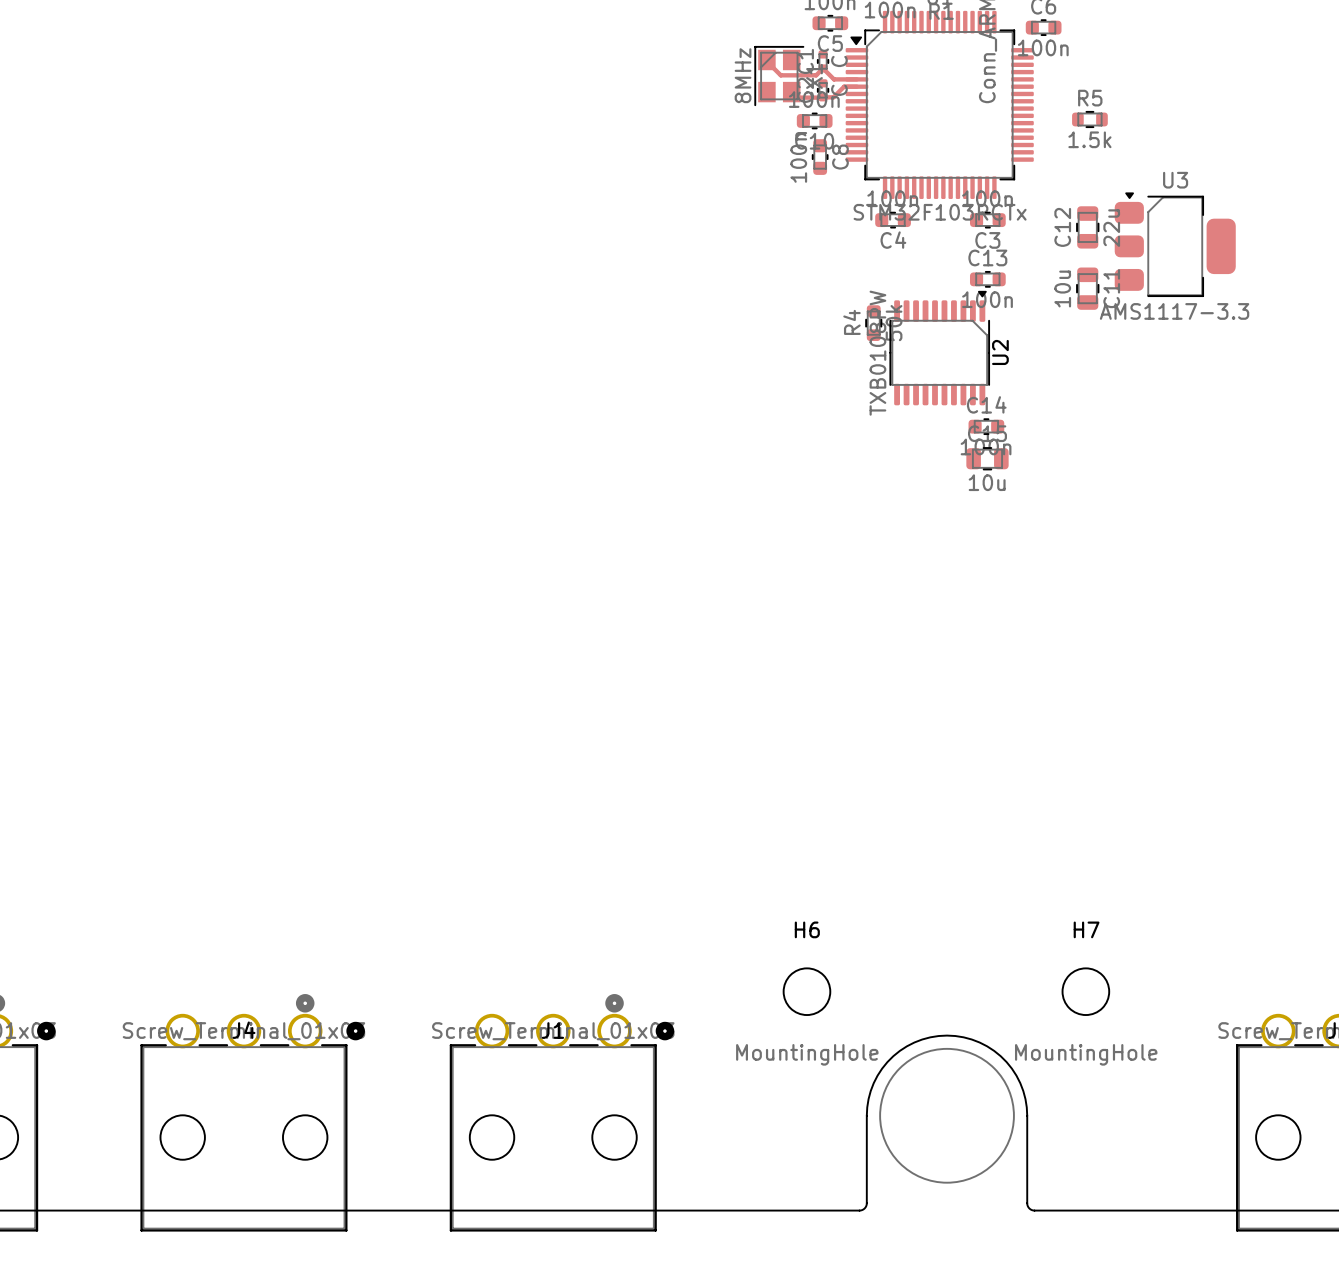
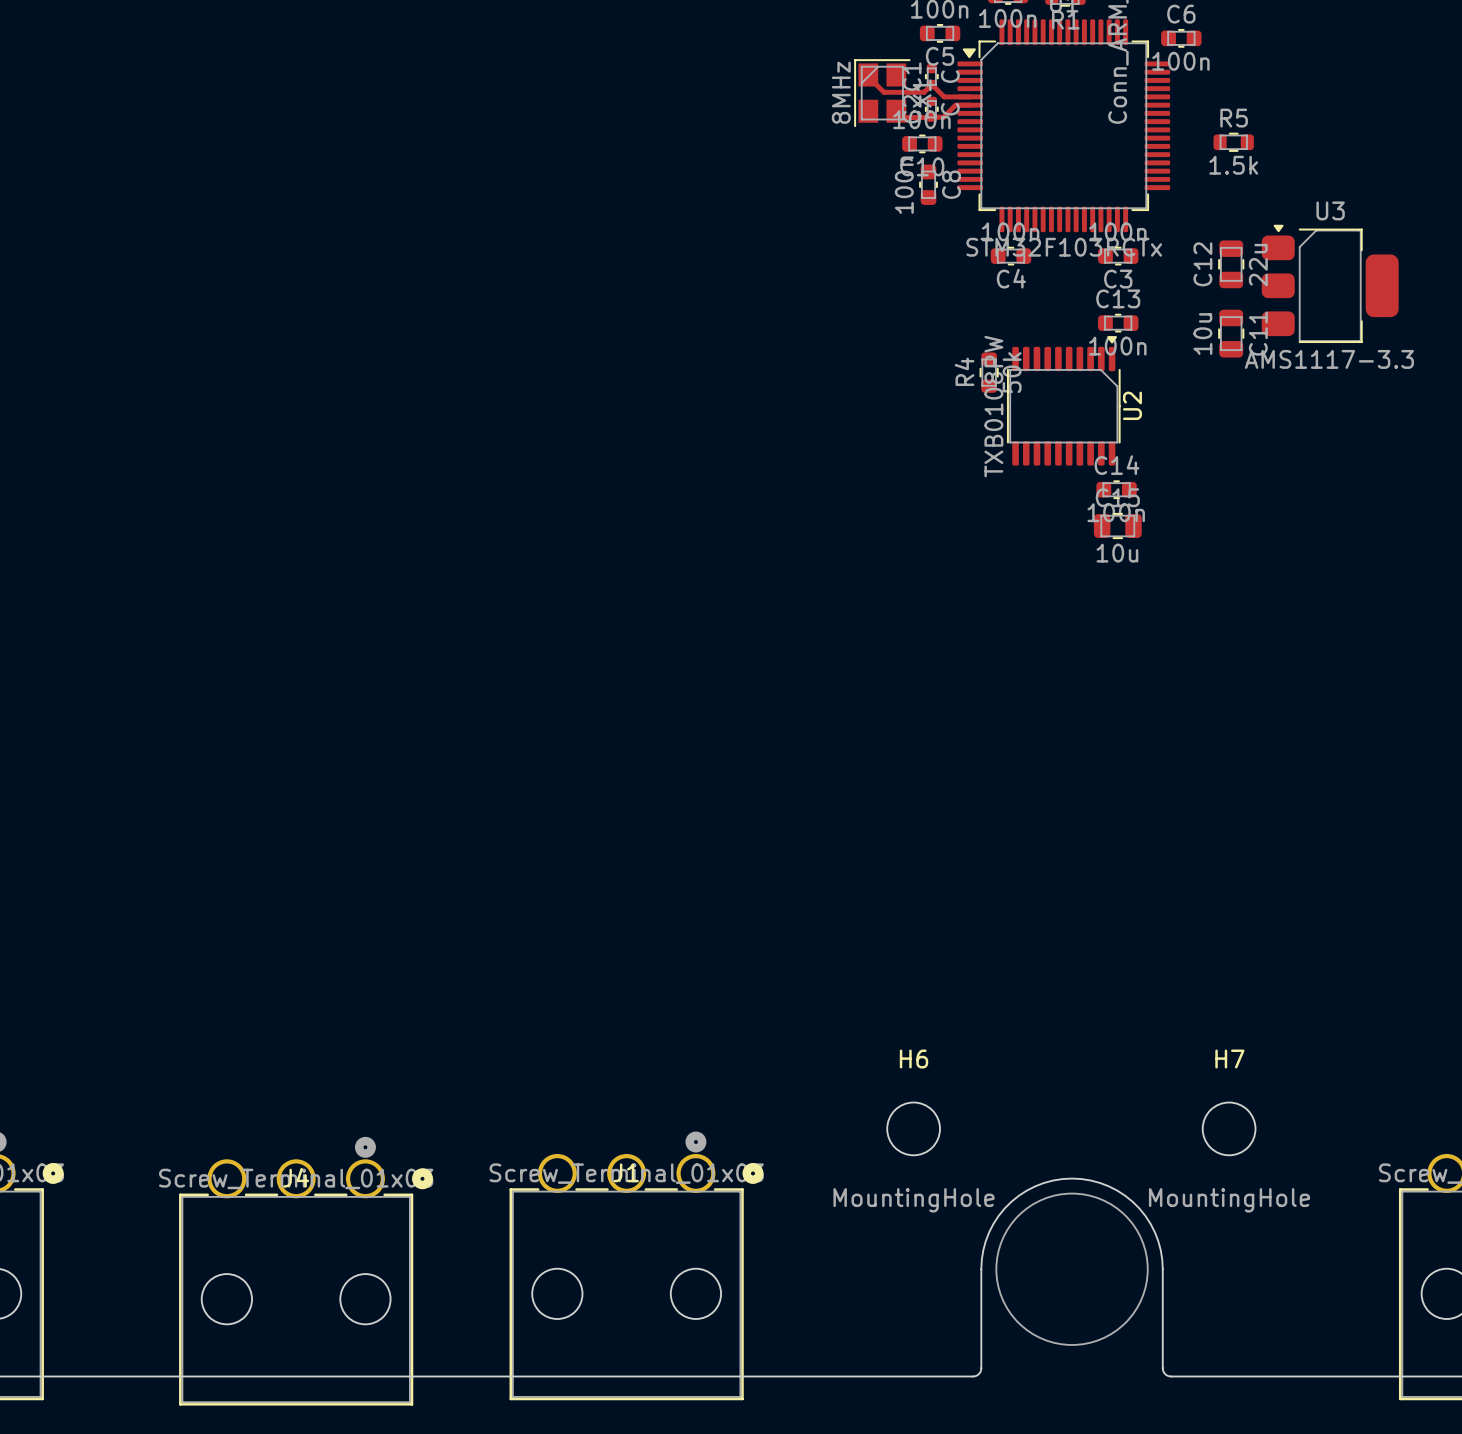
J4 position: (252, 1112) -> (306, 1271)

